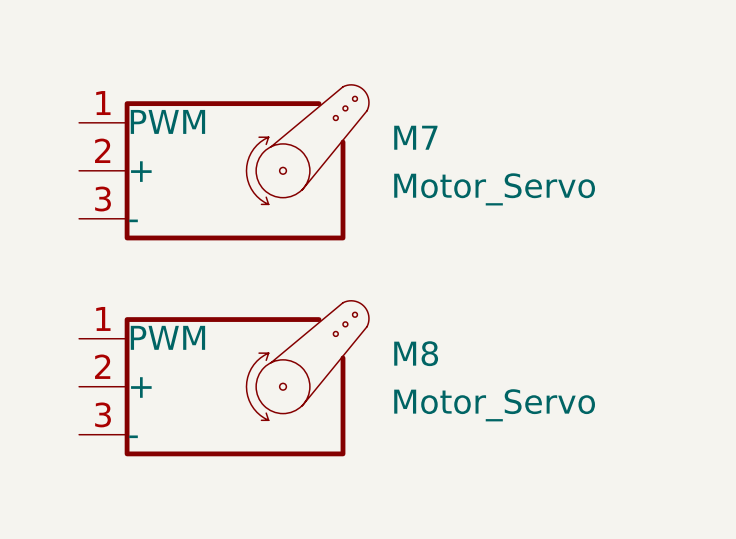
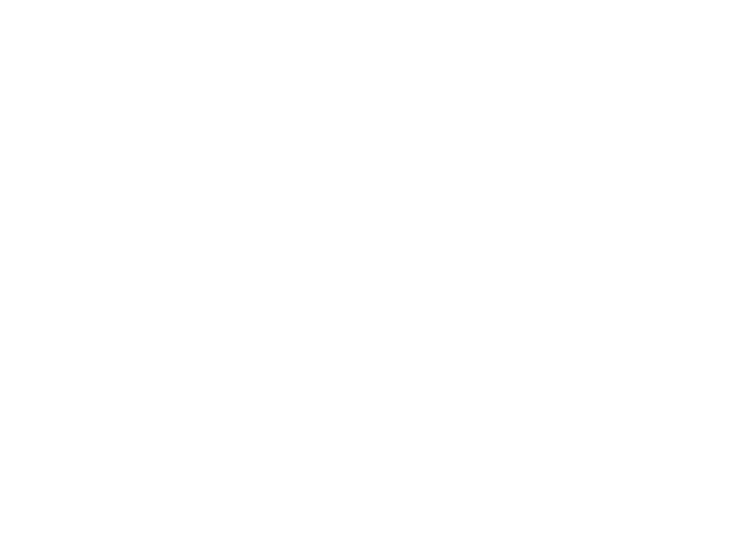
M7: Motor_Servo (224, 162) -> none
M8: Motor_Servo (224, 378) -> none

